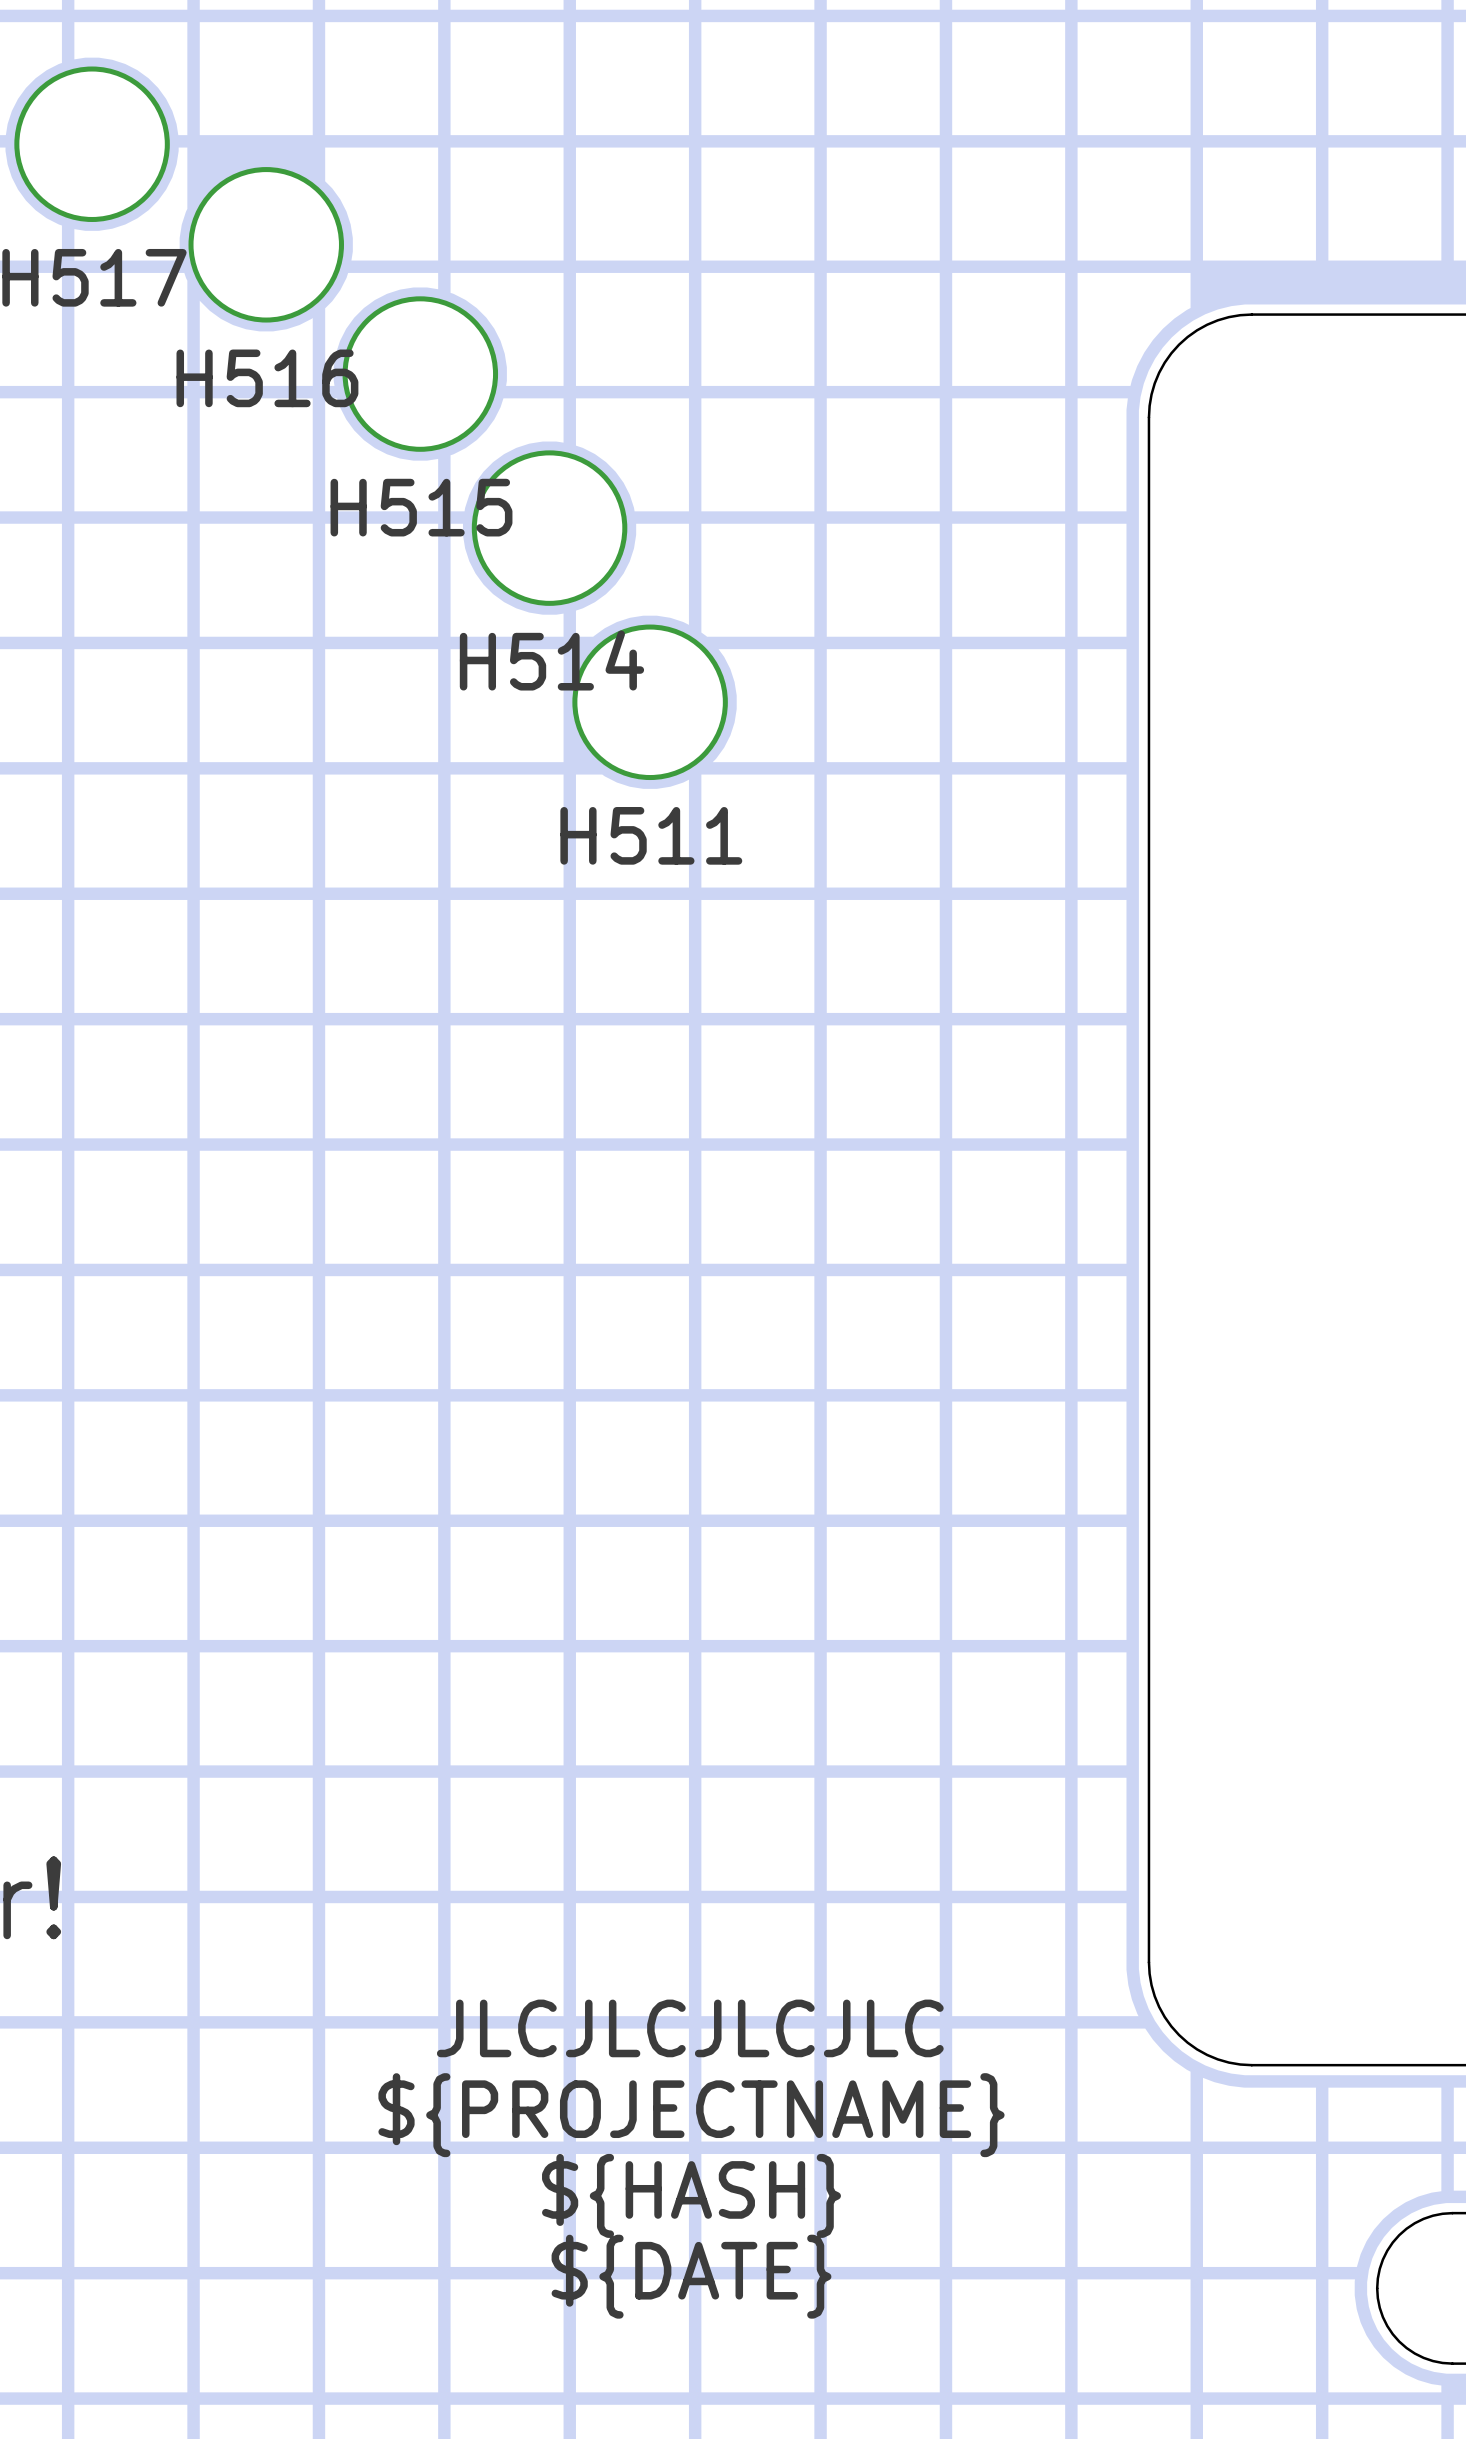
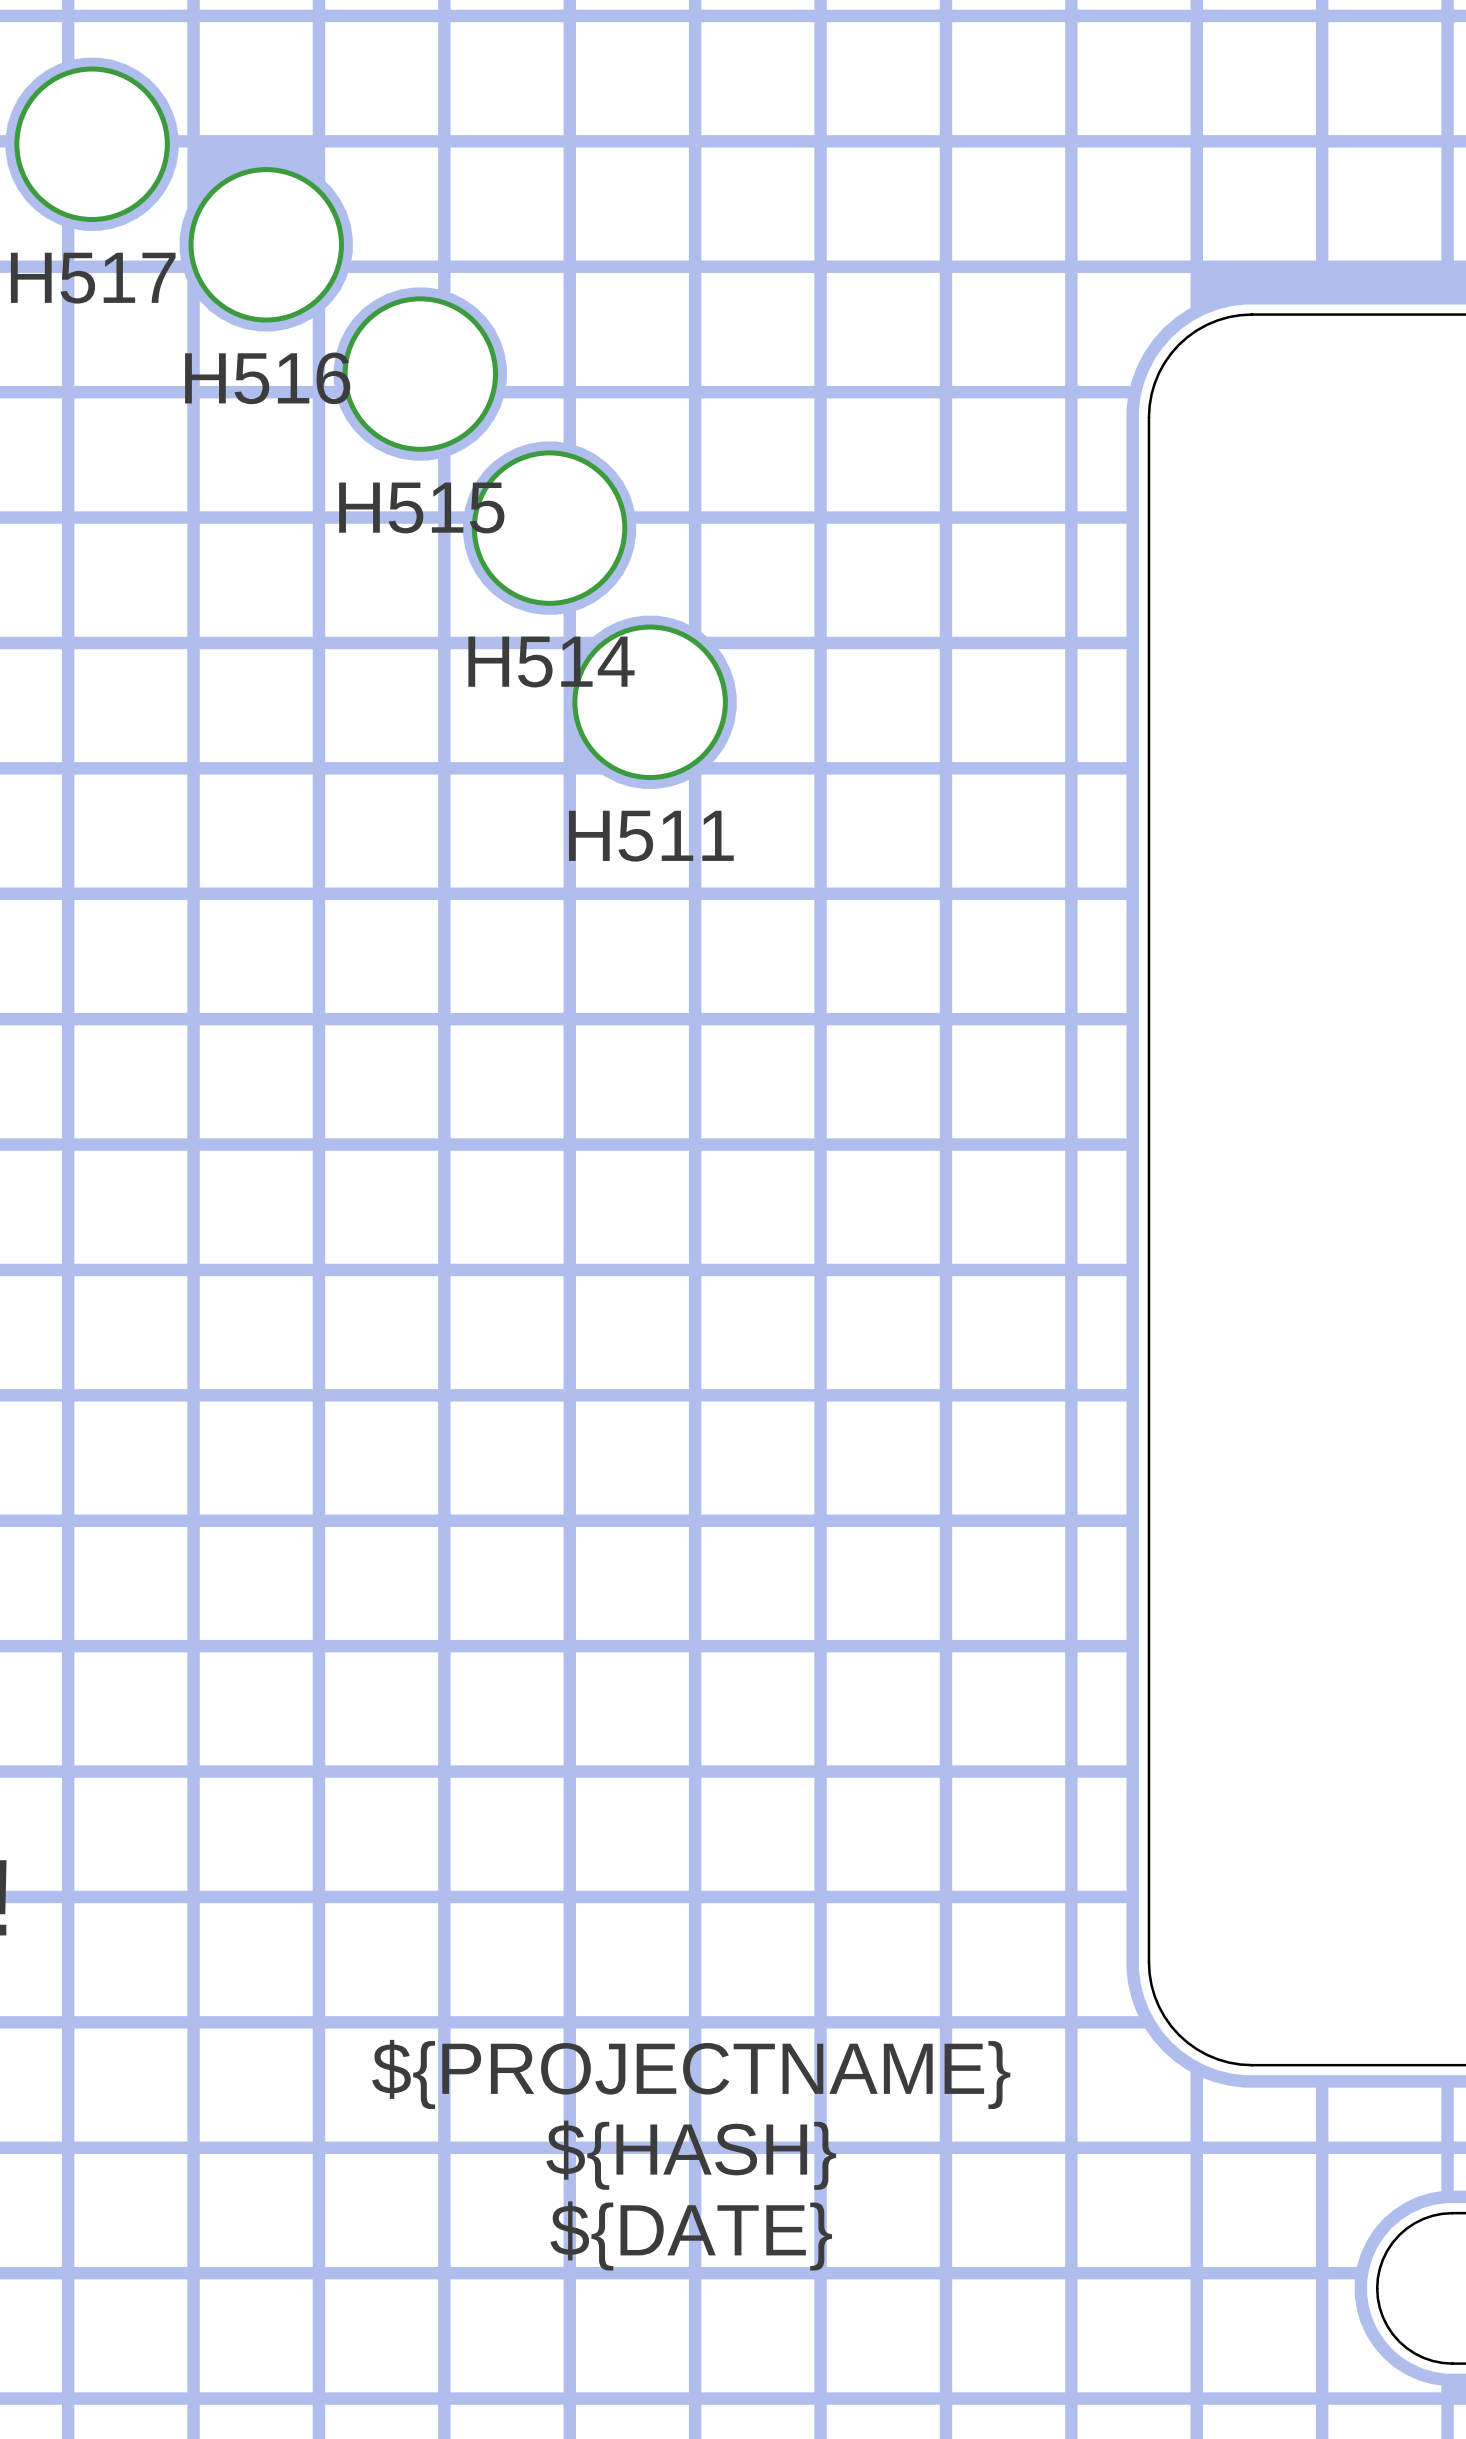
text: JLCJLCJLCJLC (690, 2028) -> none
text position: ${PROJECTNAME} (691, 2115) -> ${PROJECTNAME} (691, 2074)
text position: ${HASH} (691, 2195) -> ${HASH} (691, 2155)
text position: ${DATE} (691, 2276) -> ${DATE} (691, 2235)

